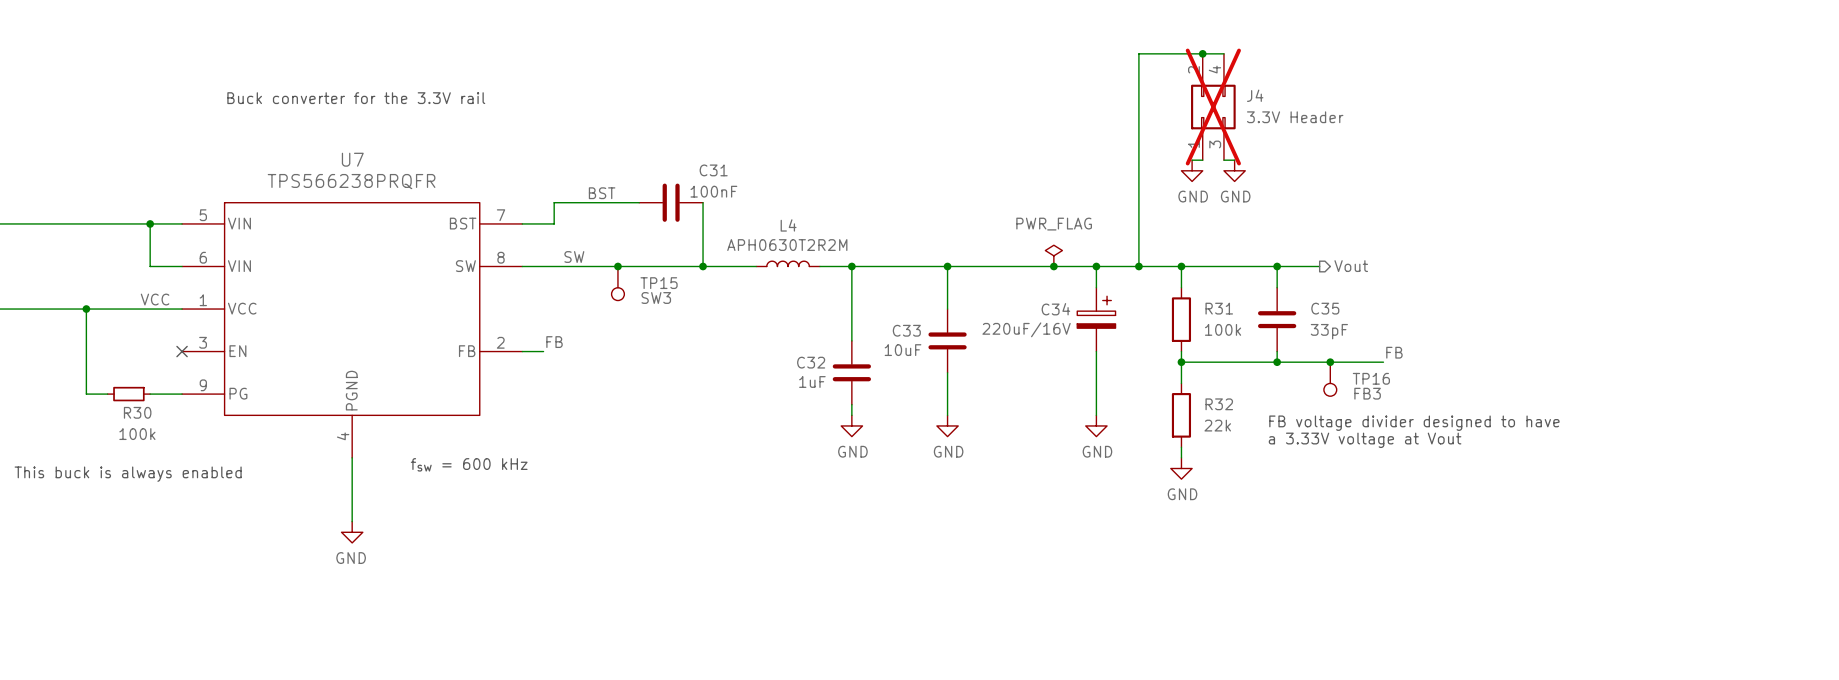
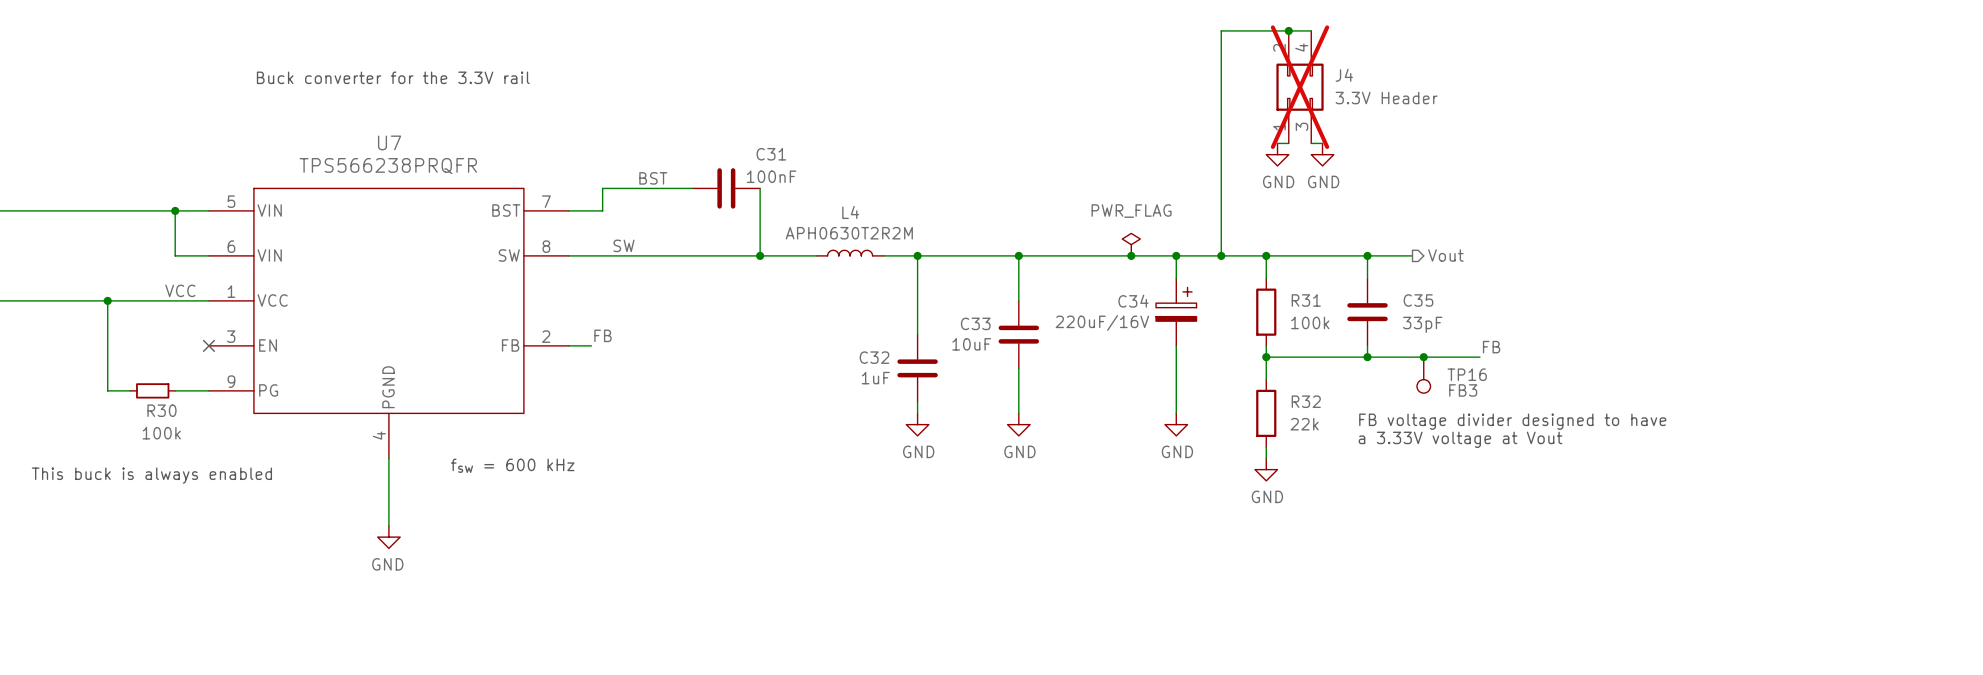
junction: (617, 266) -> none
TP15: SW3 (617, 283) -> none

